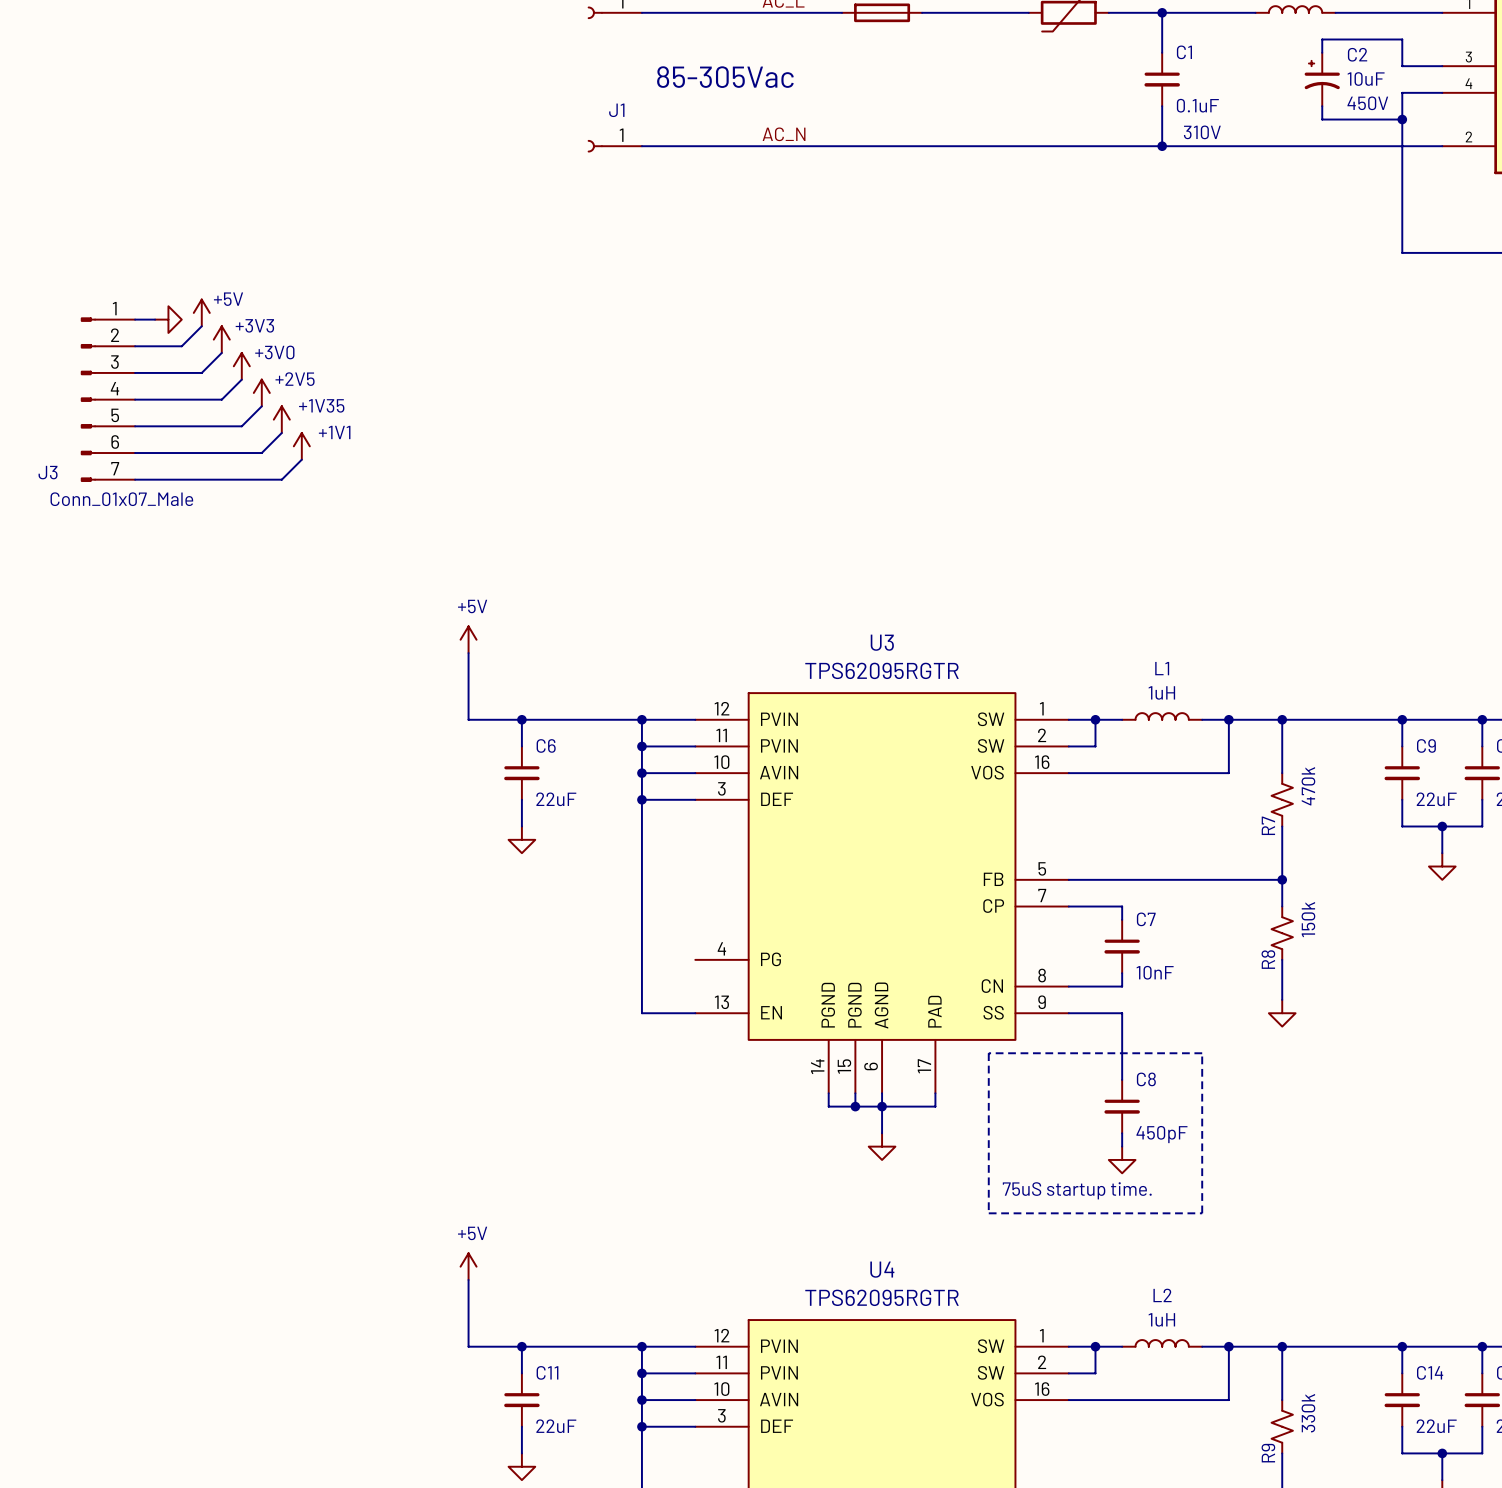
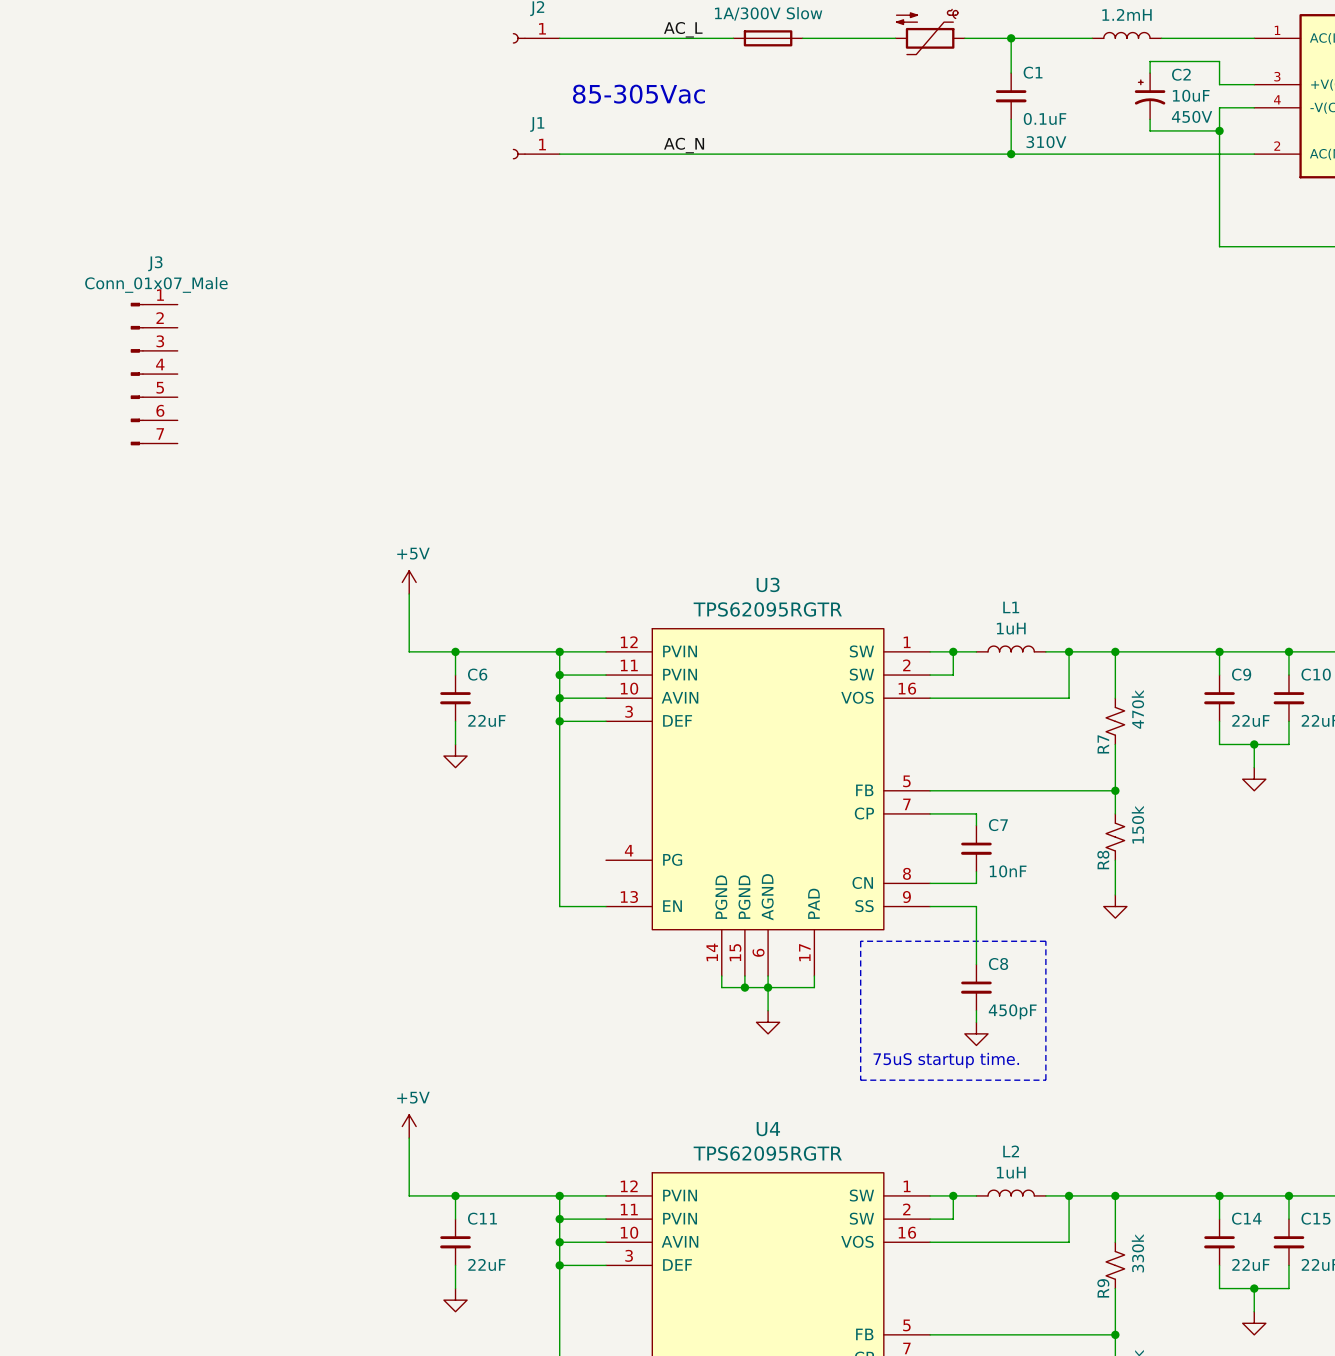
power symbol: +5V (201, 312) -> none
wire: (135, 319) (155, 319) -> none
power symbol: (168, 319) -> none
wire: (201, 326) (181, 346) (135, 346) -> none
power symbol: +3V3 (221, 339) -> none
wire: (221, 352) (201, 372) (135, 372) -> none
power symbol: +3V0 (241, 366) -> none
wire: (241, 379) (221, 399) (135, 399) -> none
power symbol: +2V5 (261, 392) -> none
J3 position: (108, 399) -> (154, 374)
wire: (261, 406) (241, 426) (135, 426) -> none
power symbol: +1V35 (281, 419) -> none
wire: (281, 432) (261, 453) (135, 453) -> none
power symbol: +1V1 (301, 446) -> none
wire: (301, 459) (281, 479) (135, 479) -> none
J3 name position: J3 (48, 472) -> J3 (155, 263)
J3 value position: Conn_01x07_Male (121, 499) -> Conn_01x07_Male (156, 284)

